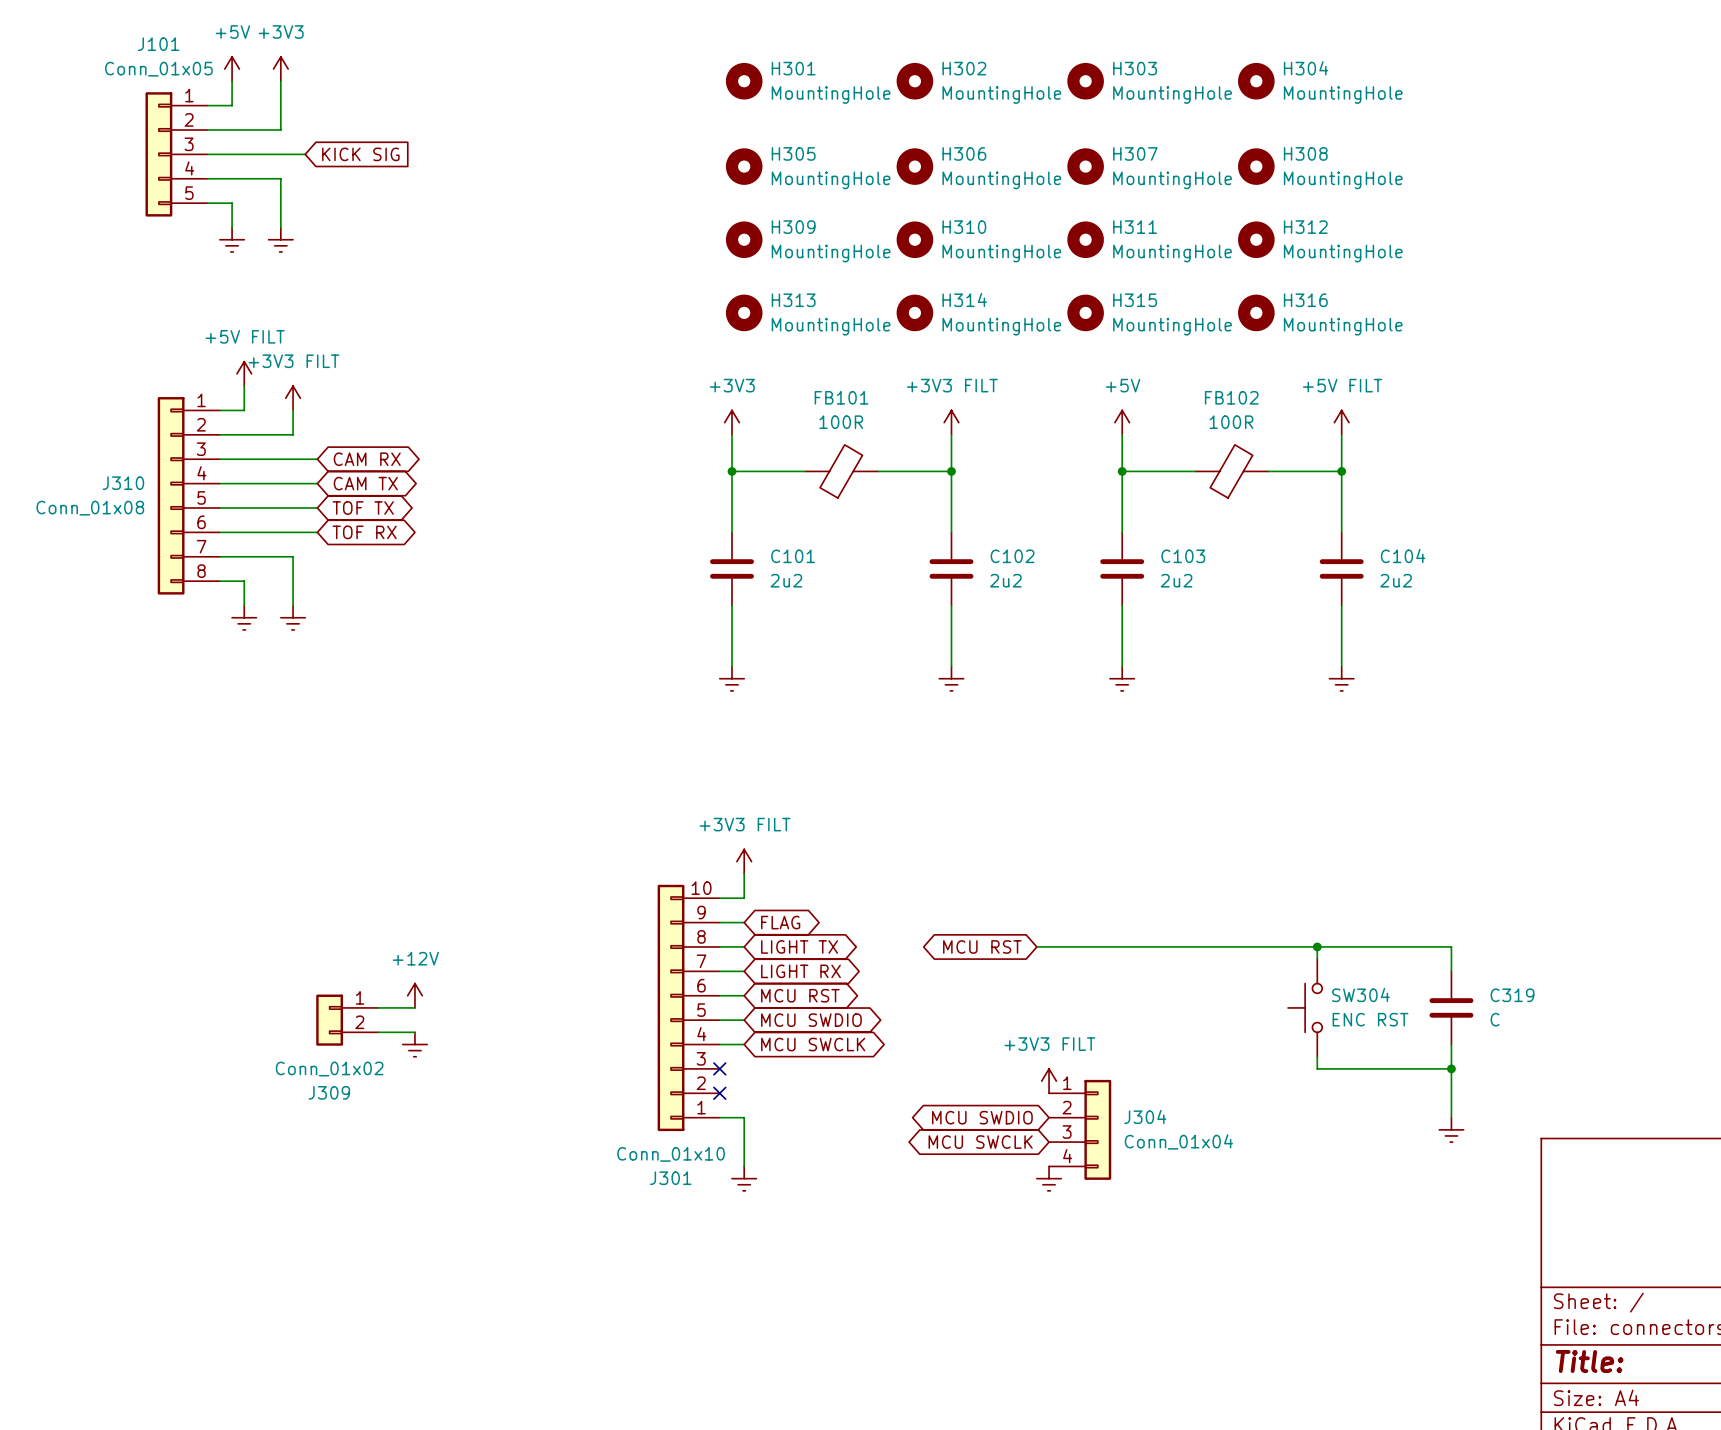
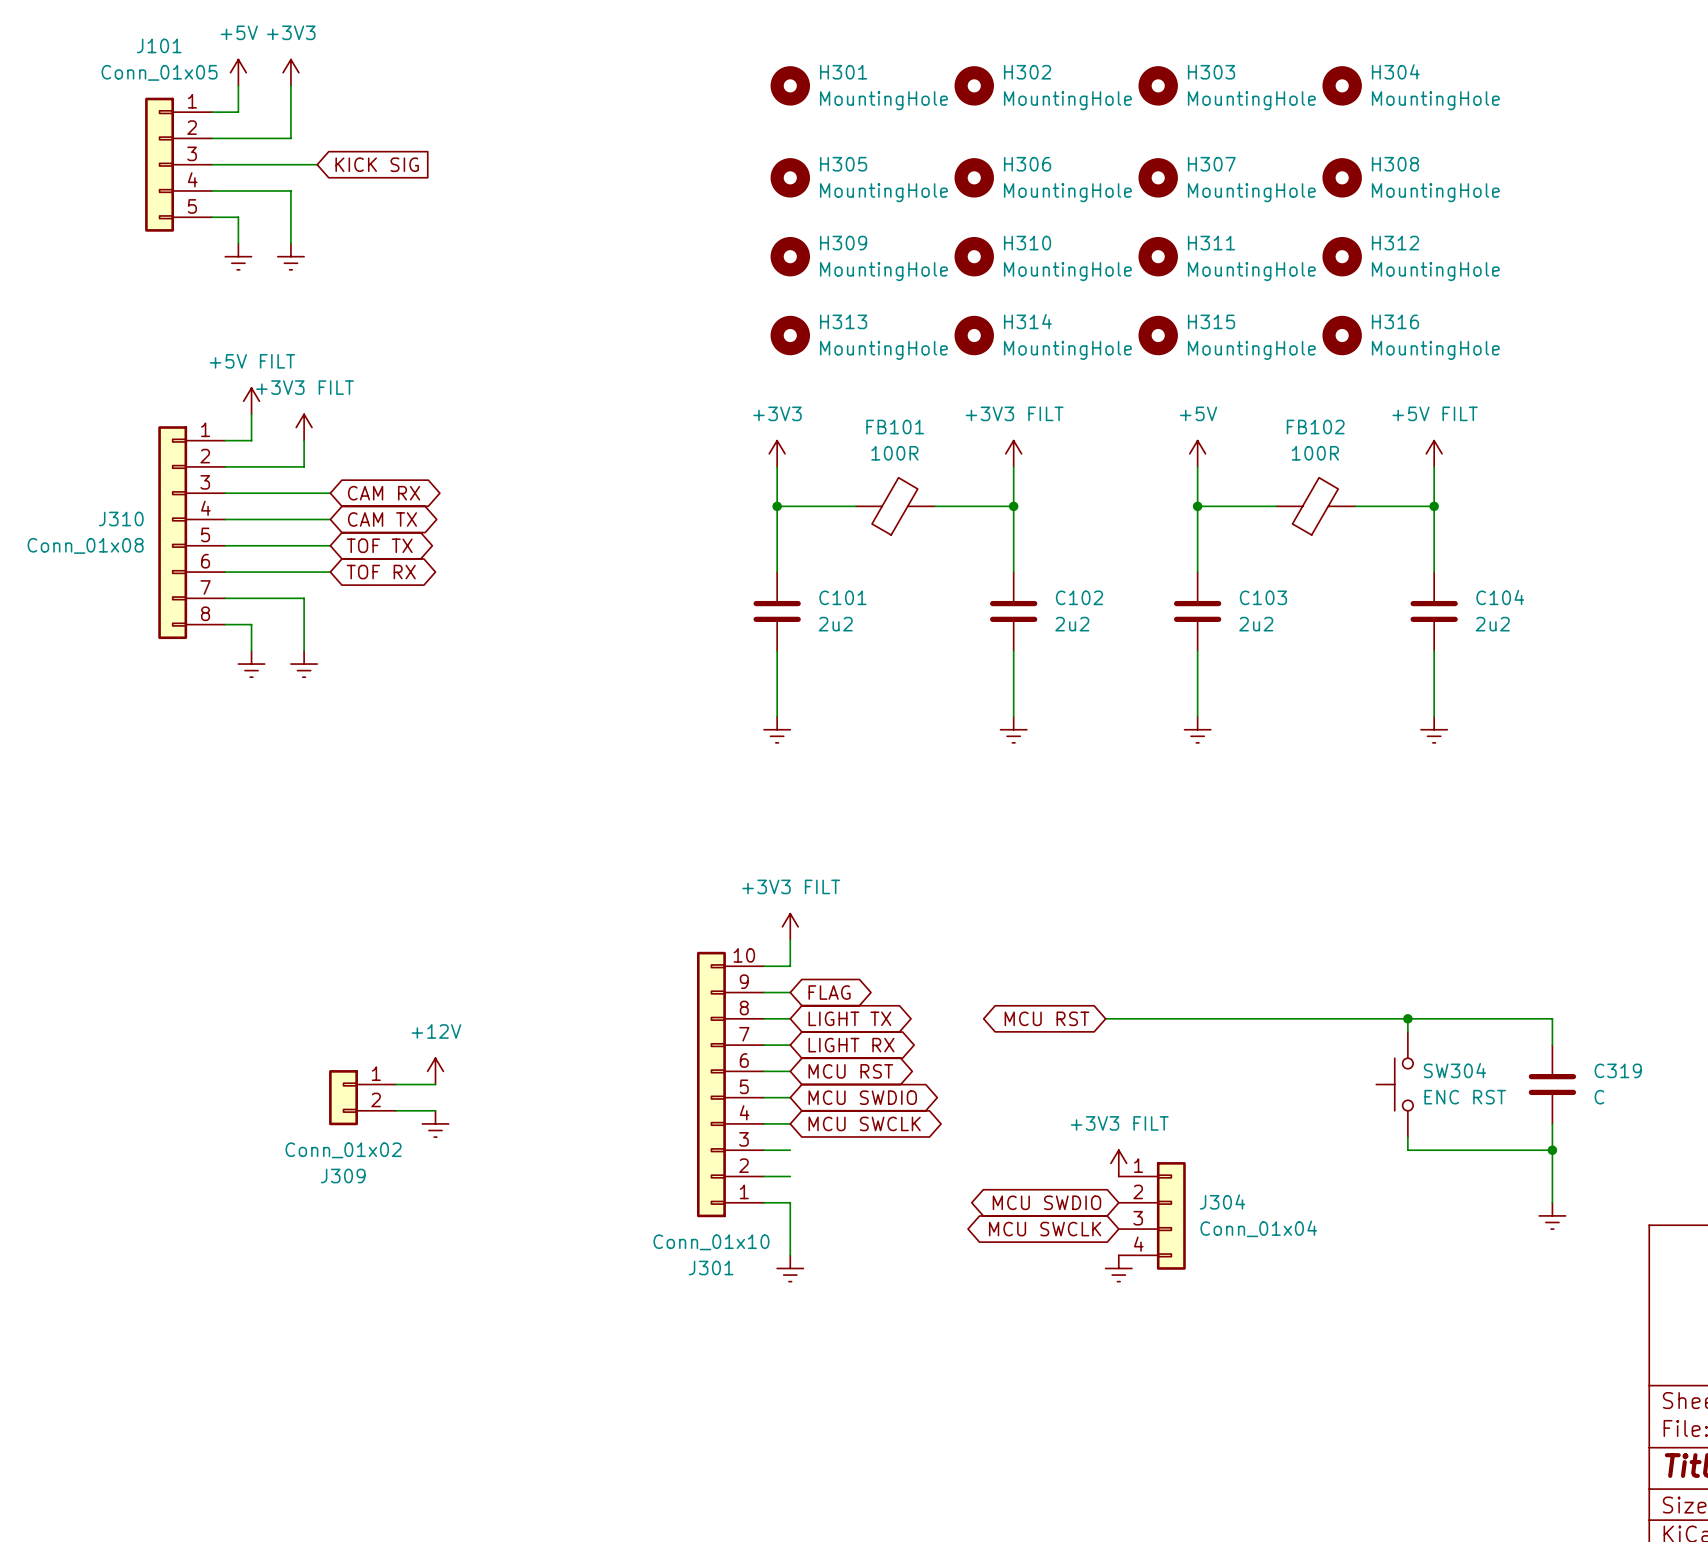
wire: none -> (764, 1150) (790, 1150)
no-connect mark: (719, 1068) -> none
wire: none -> (764, 1176) (790, 1176)
no-connect mark: (719, 1093) -> none

